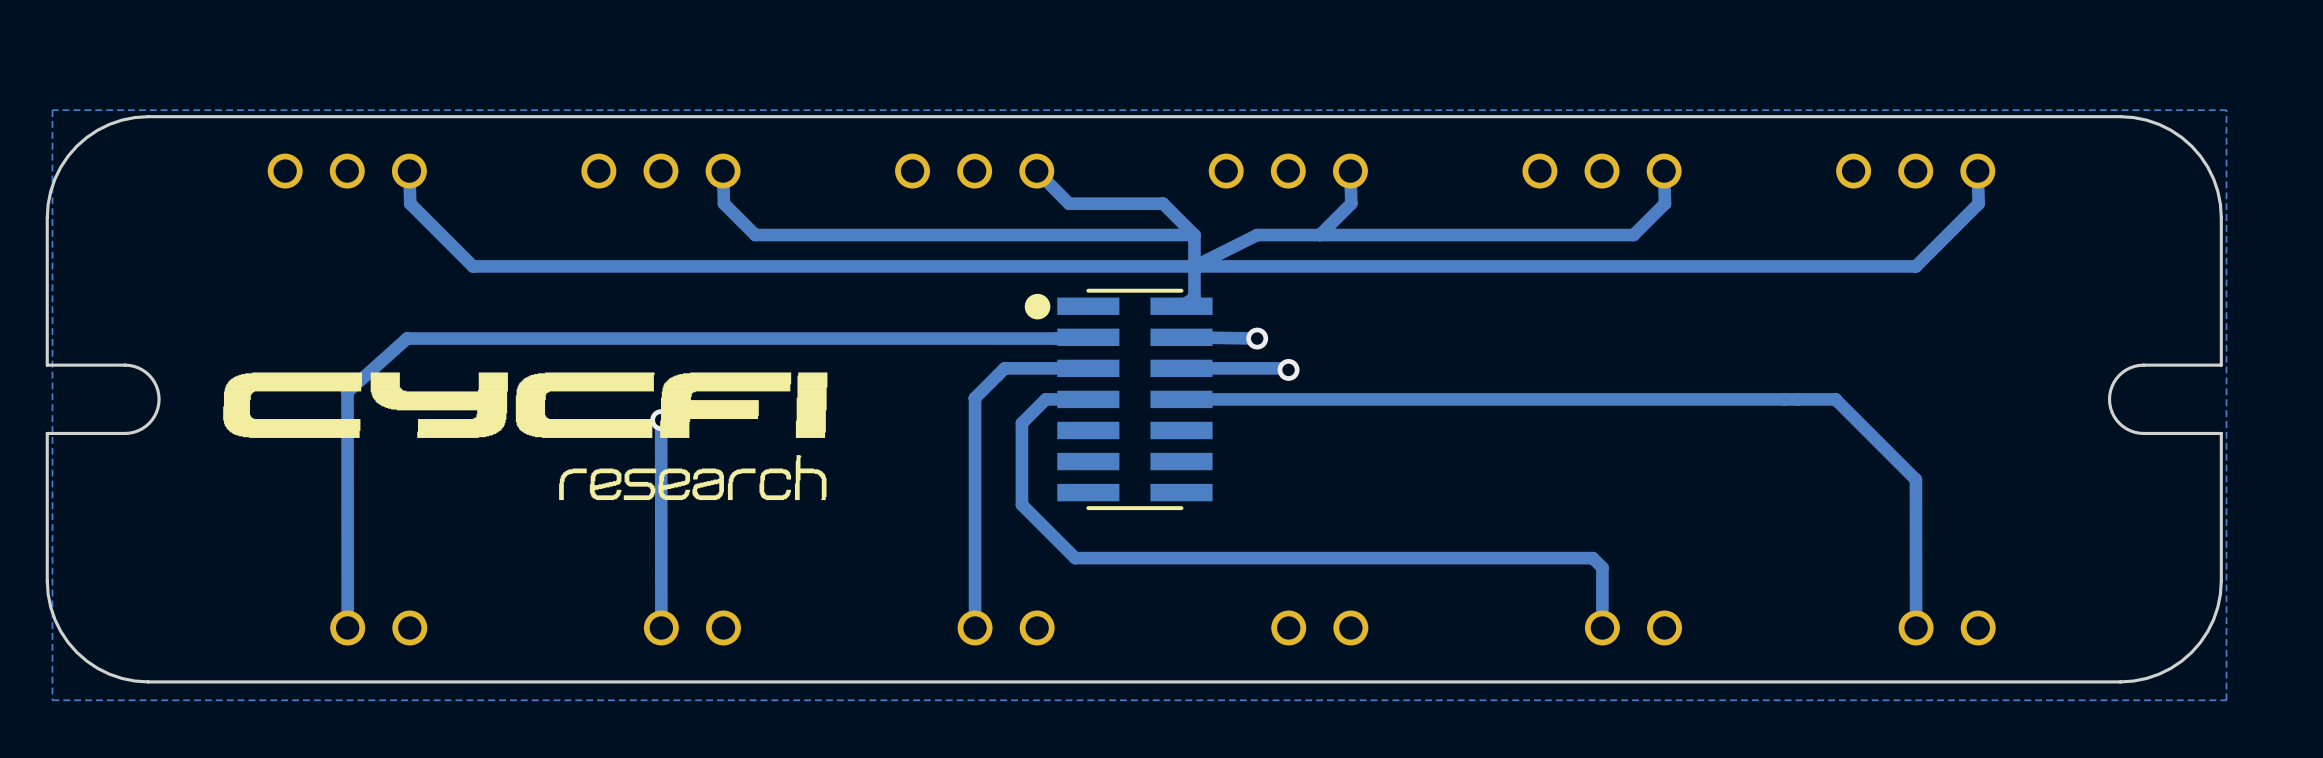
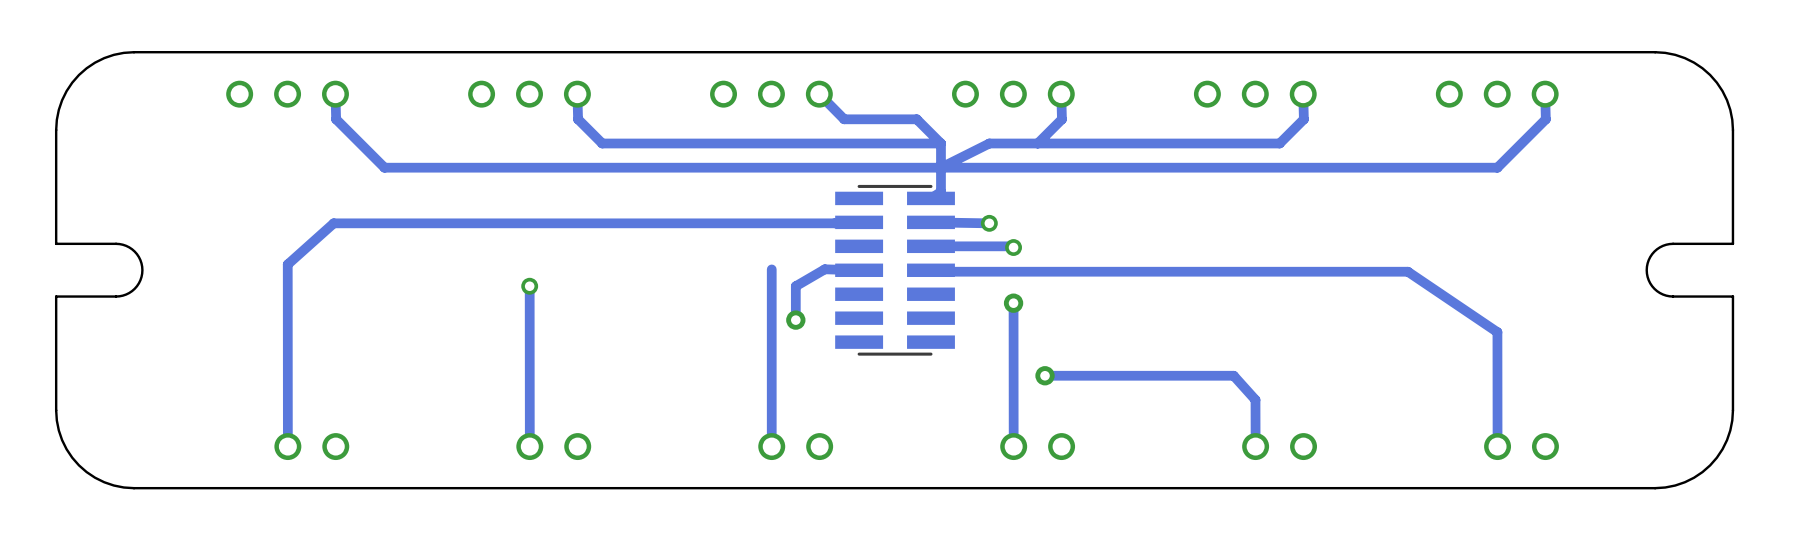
zone outline: (2226, 110) (2226, 700) (52, 700) (52, 110) (2226, 110) -> none
drawing: [1024, 293, 1051, 320] -> none
track: (1088, 368) (1004, 368) (974, 398) -> none
drawing: [223, 372, 828, 501] -> none
track: (1088, 399) (1045, 399) (1021, 423) (1021, 504) (1075, 558) (1592, 558) (1602, 567) (1602, 627) -> (1045, 375) (1233, 375) (1255, 399) (1255, 446)
track: none -> (859, 270) (824, 269) (795, 286) (795, 320)
track: (1181, 399) (1835, 399) (1915, 479) -> (943, 271) (1407, 271) (1497, 332)
track: none -> (1013, 303) (1013, 446)
via: none -> (1013, 303)
via: none -> (795, 320)
via: none -> (1045, 375)

